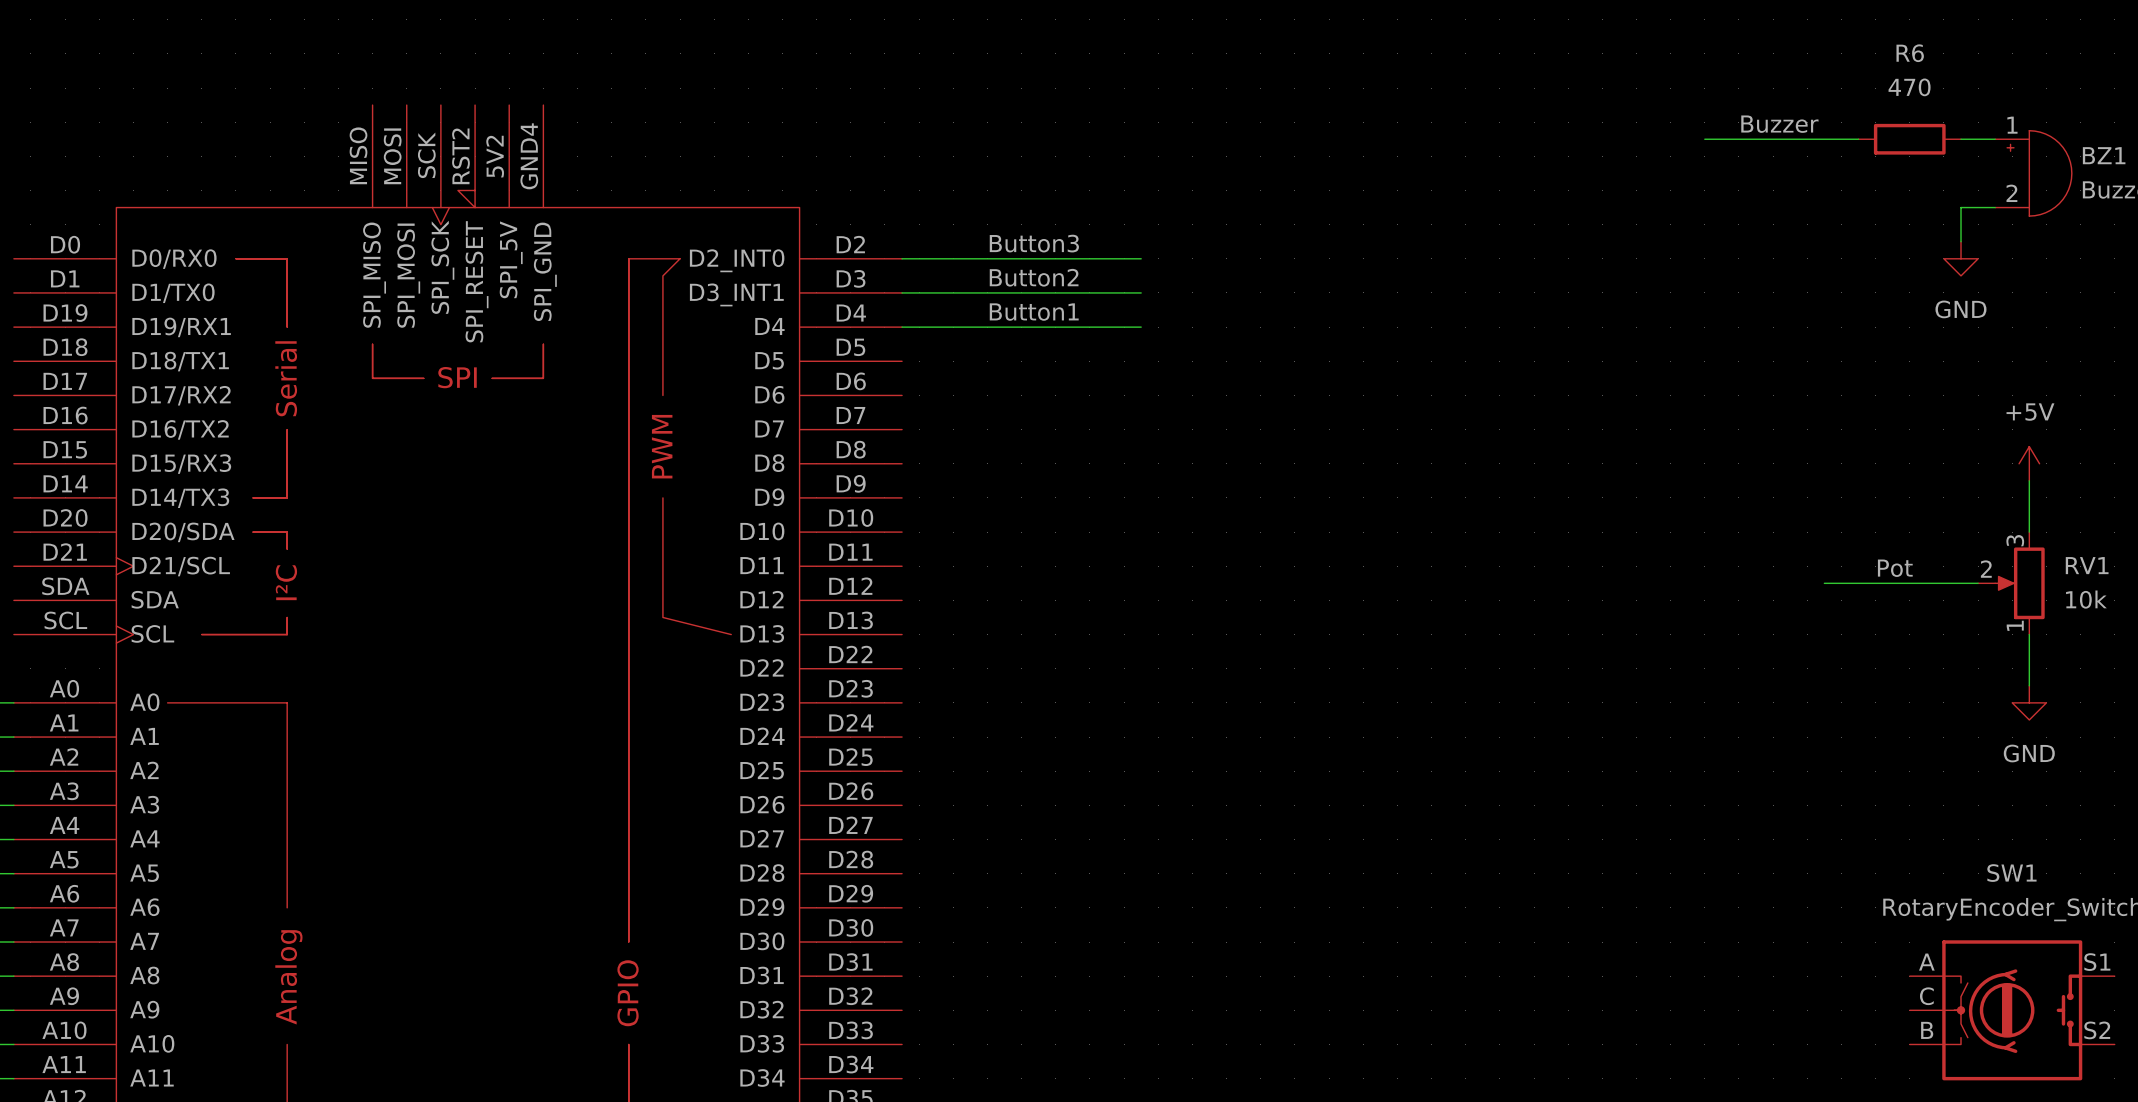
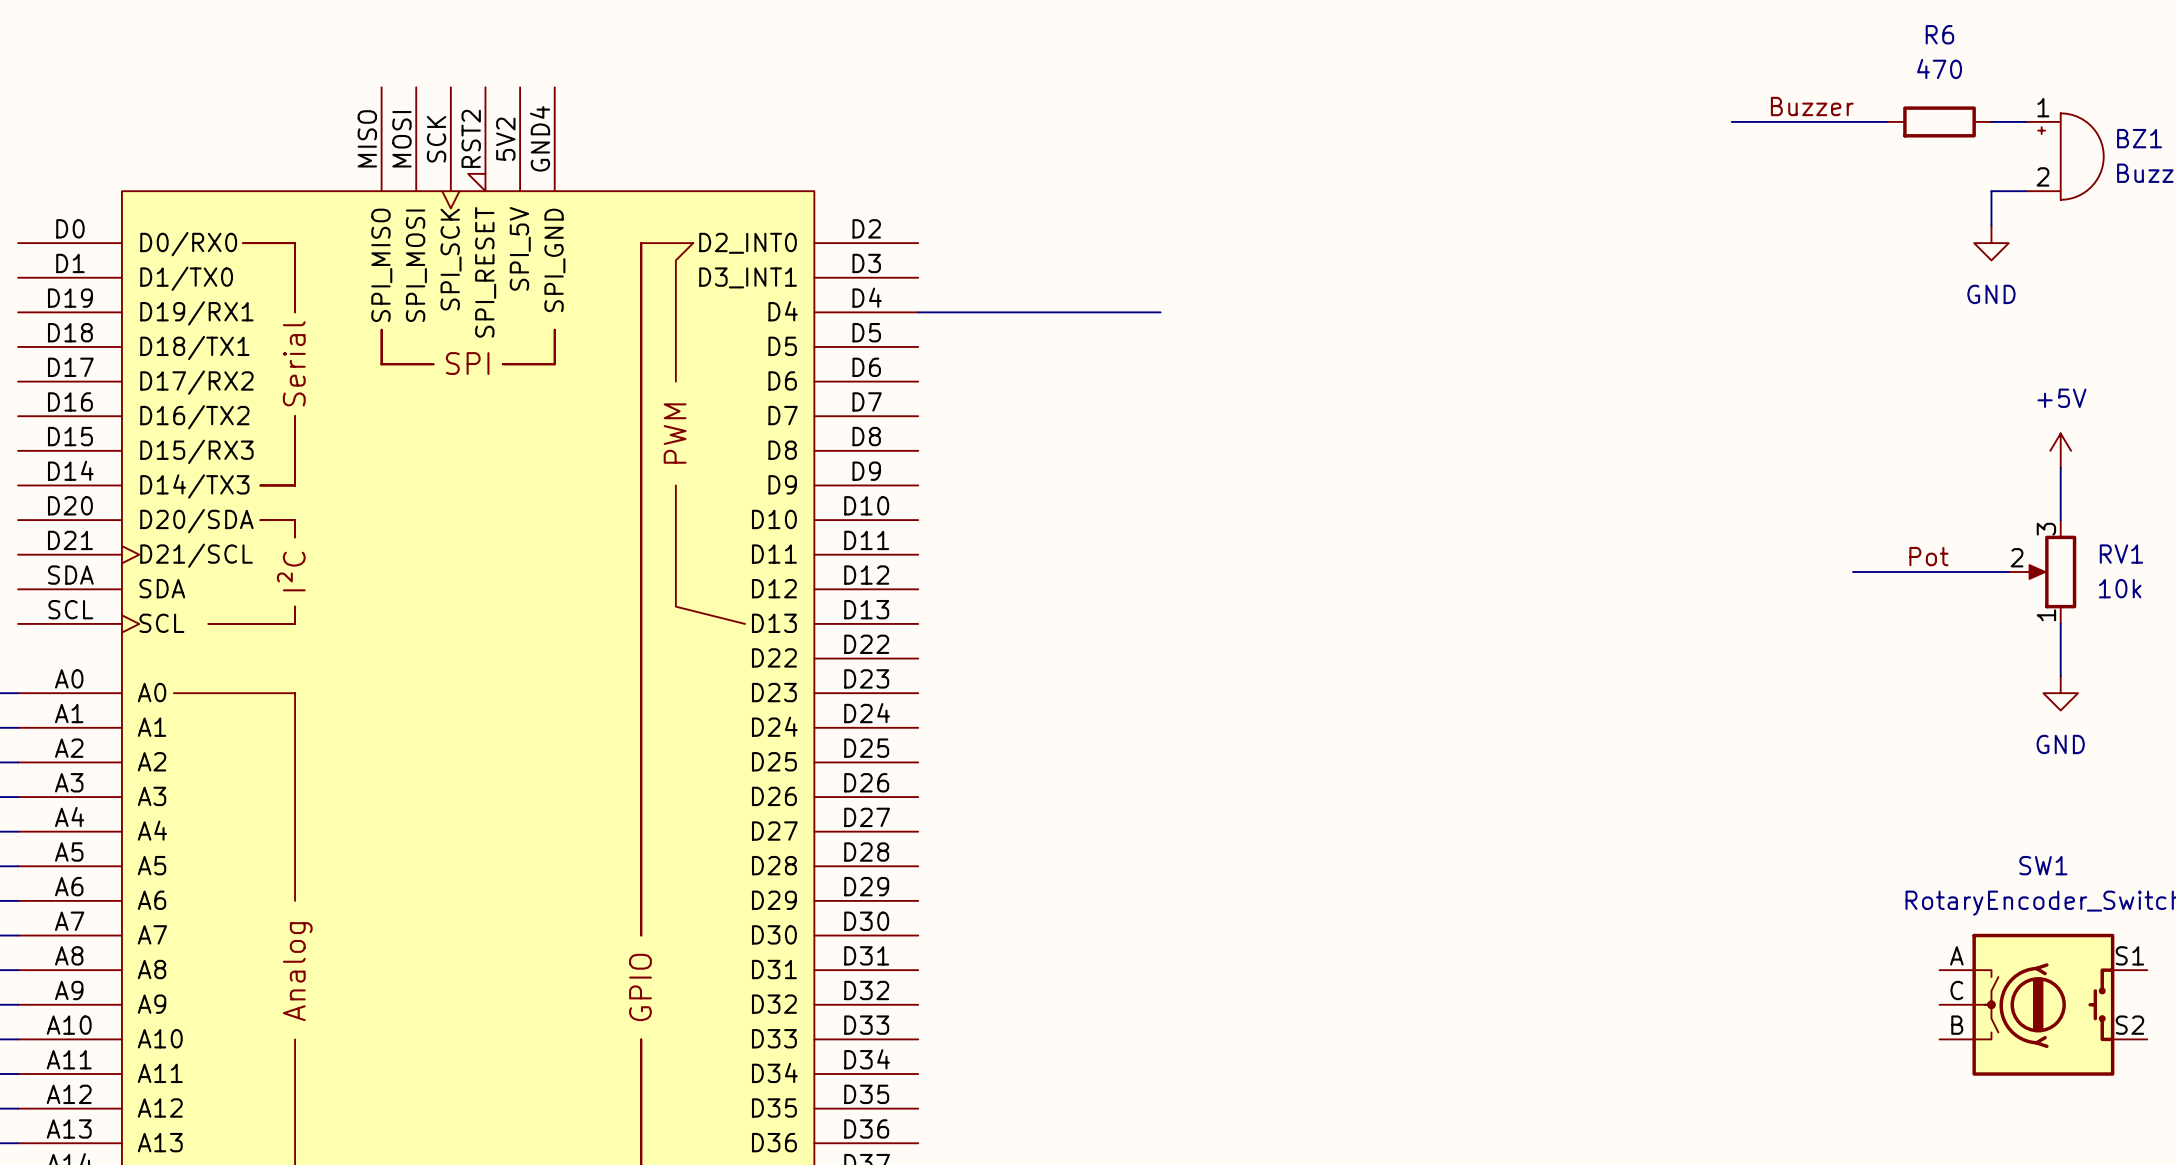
label: Button3 (1034, 243) -> none
wire: (902, 258) (1141, 258) -> none
label: Button2 (1034, 277) -> none
wire: (902, 292) (1141, 292) -> none
label: Button1 (1034, 312) -> none

